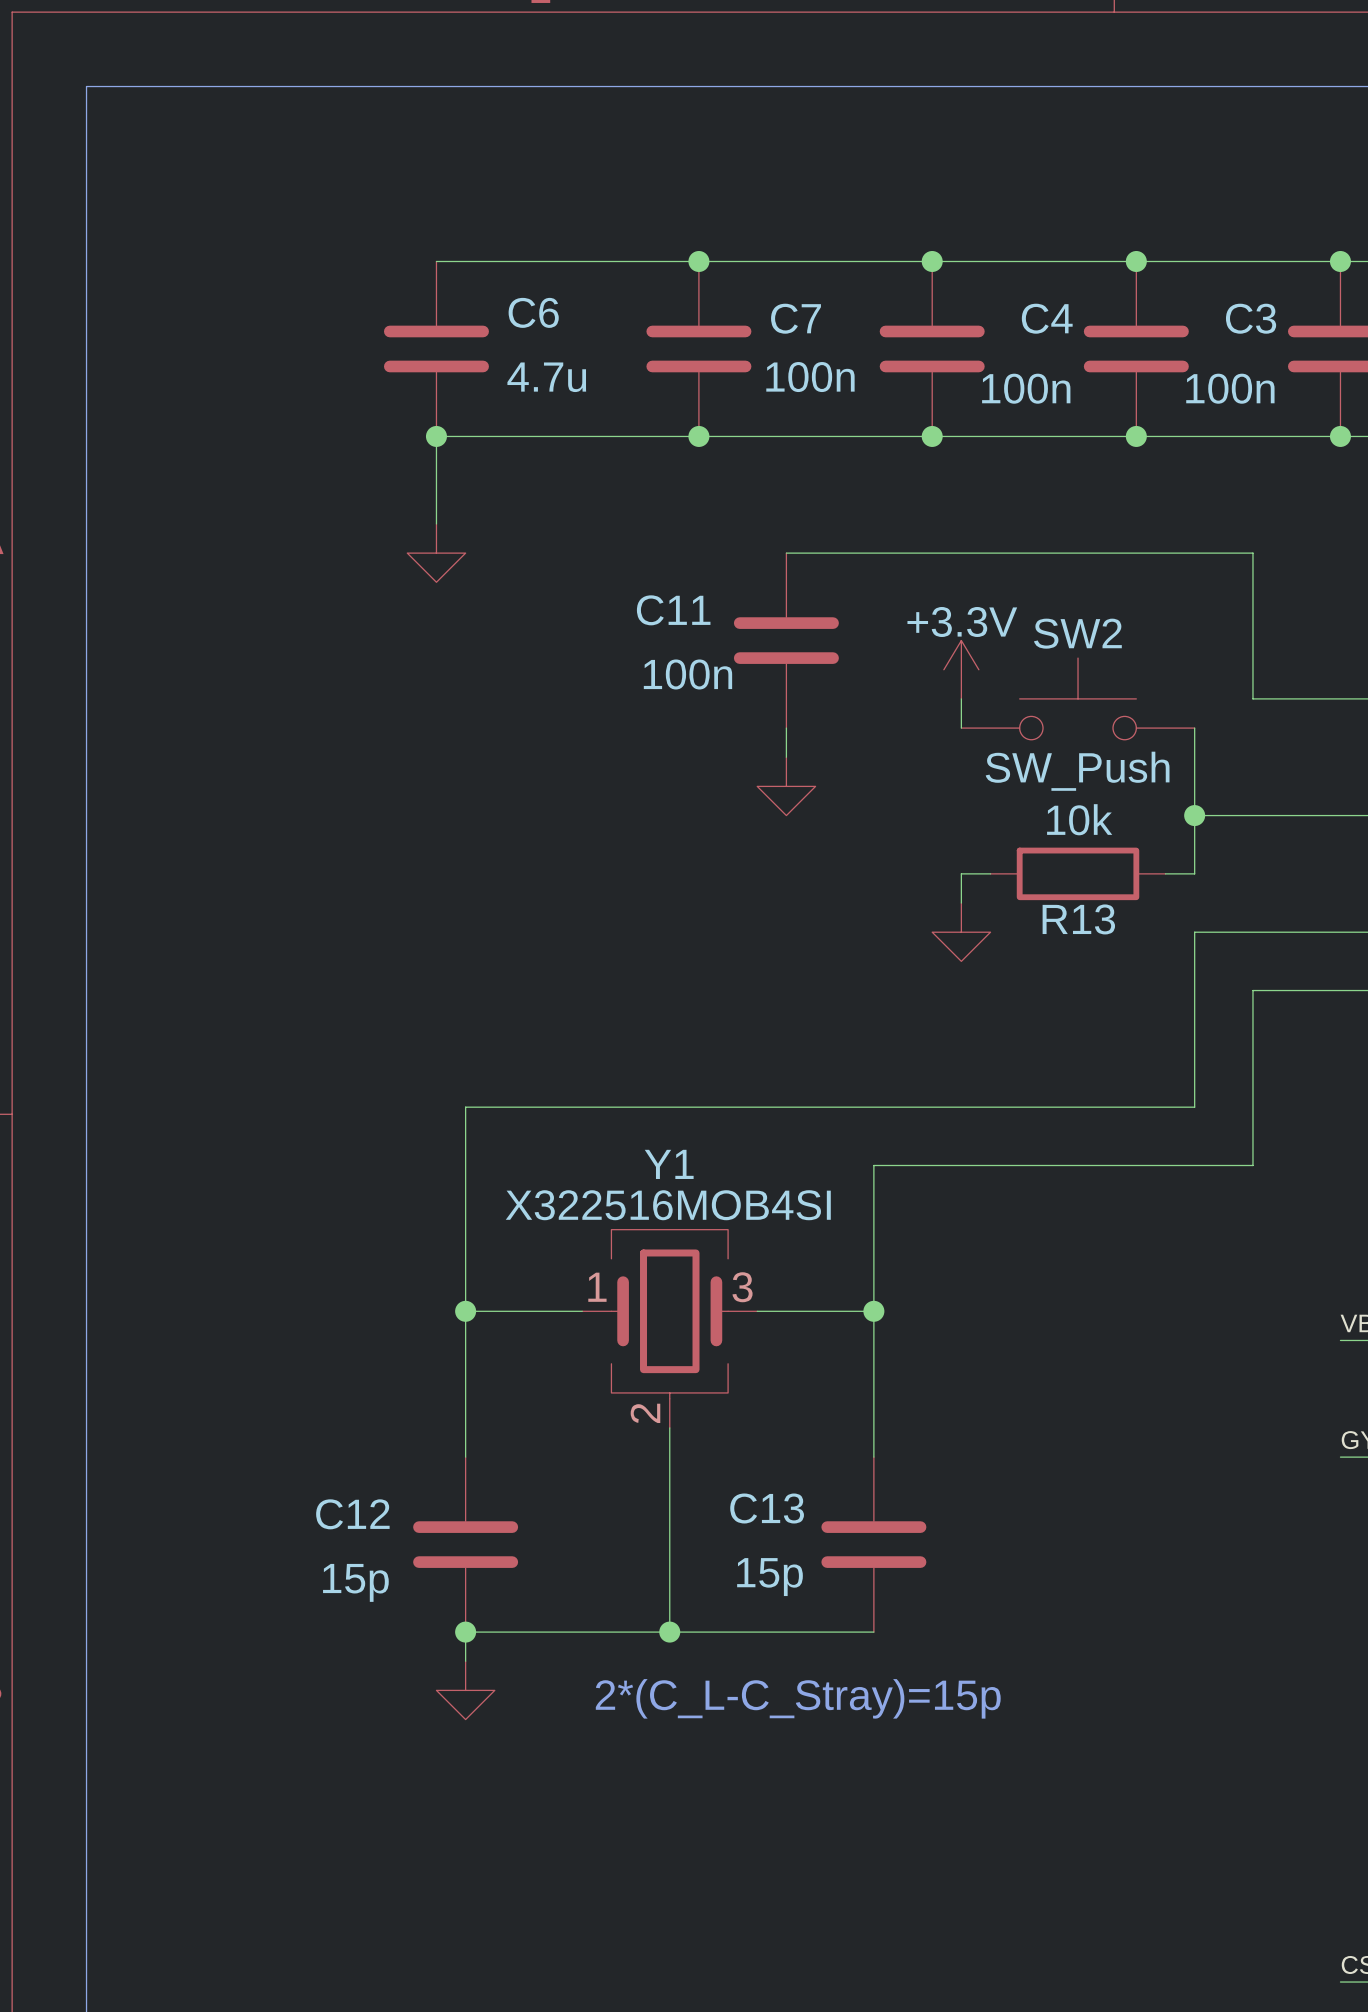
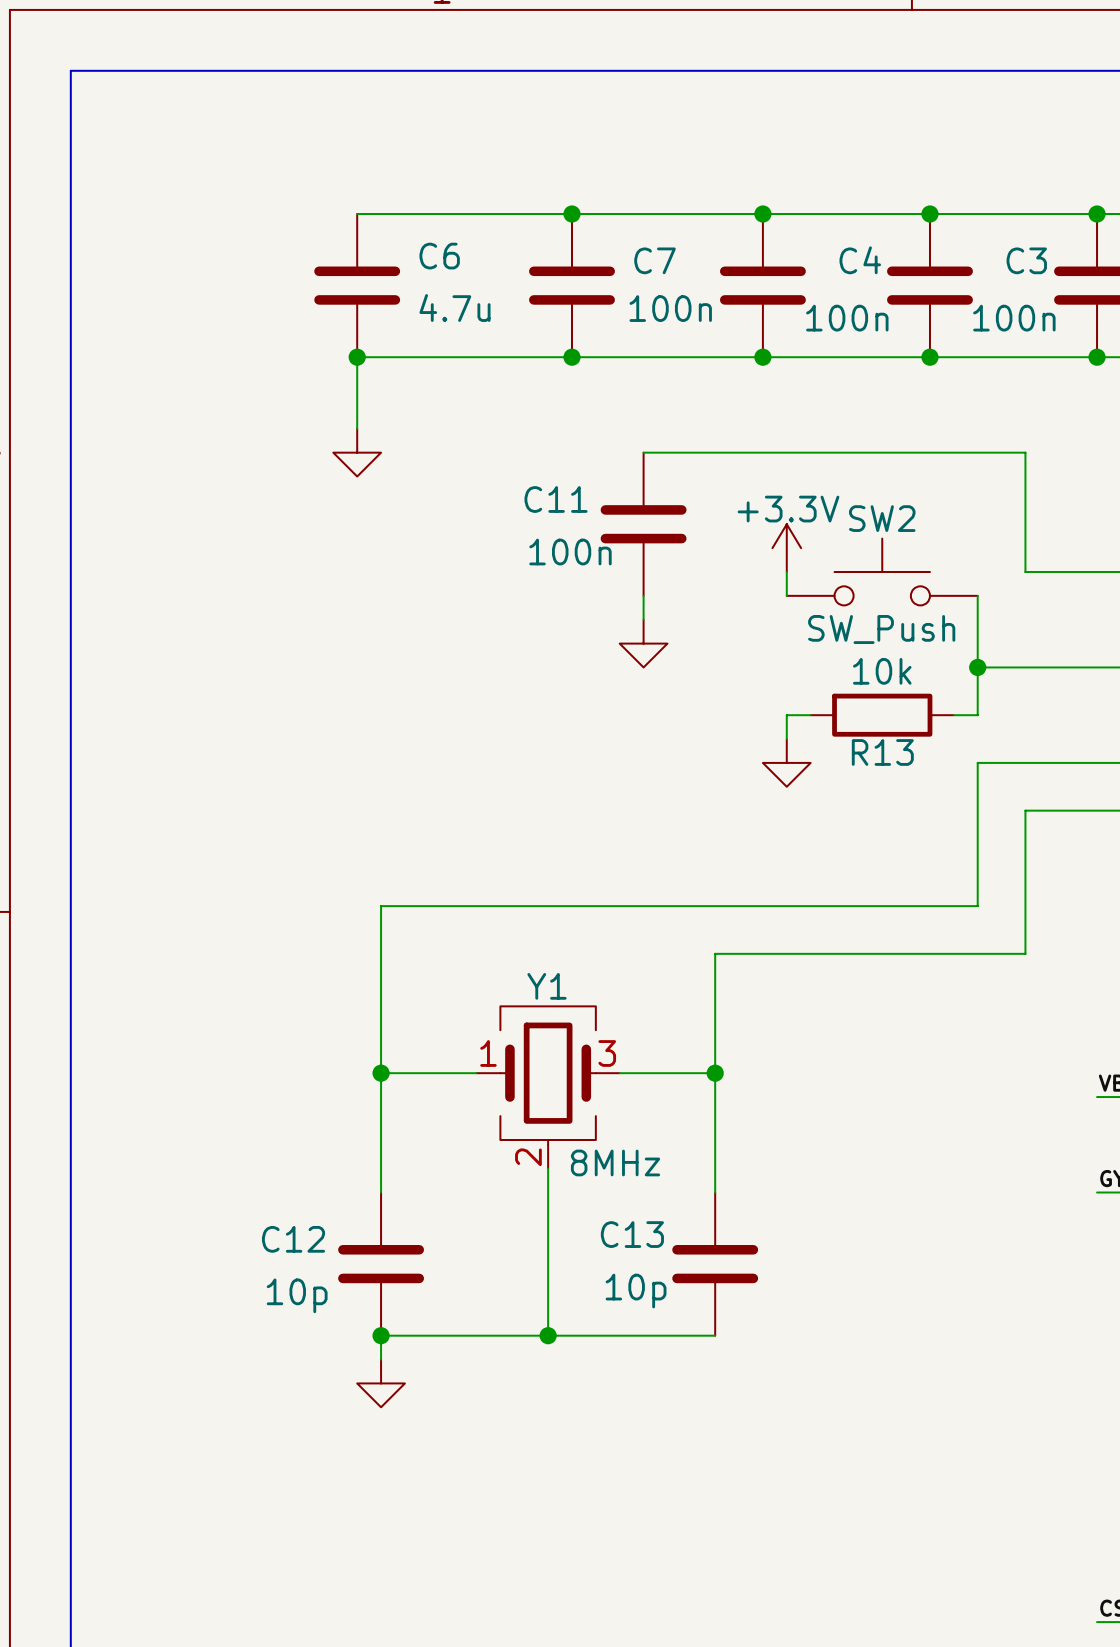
Y1 name position: Y1 (669, 1164) -> Y1 (546, 986)
Y1 value: X322516MOB4SI (668, 1205) -> 8MHz (615, 1162)
C13 value: 15p (770, 1577) -> 10p (636, 1291)
C12 value: 15p (355, 1582) -> 10p (297, 1295)
text: 2*(C_L-C_Stray)=15p (798, 1698) -> none

